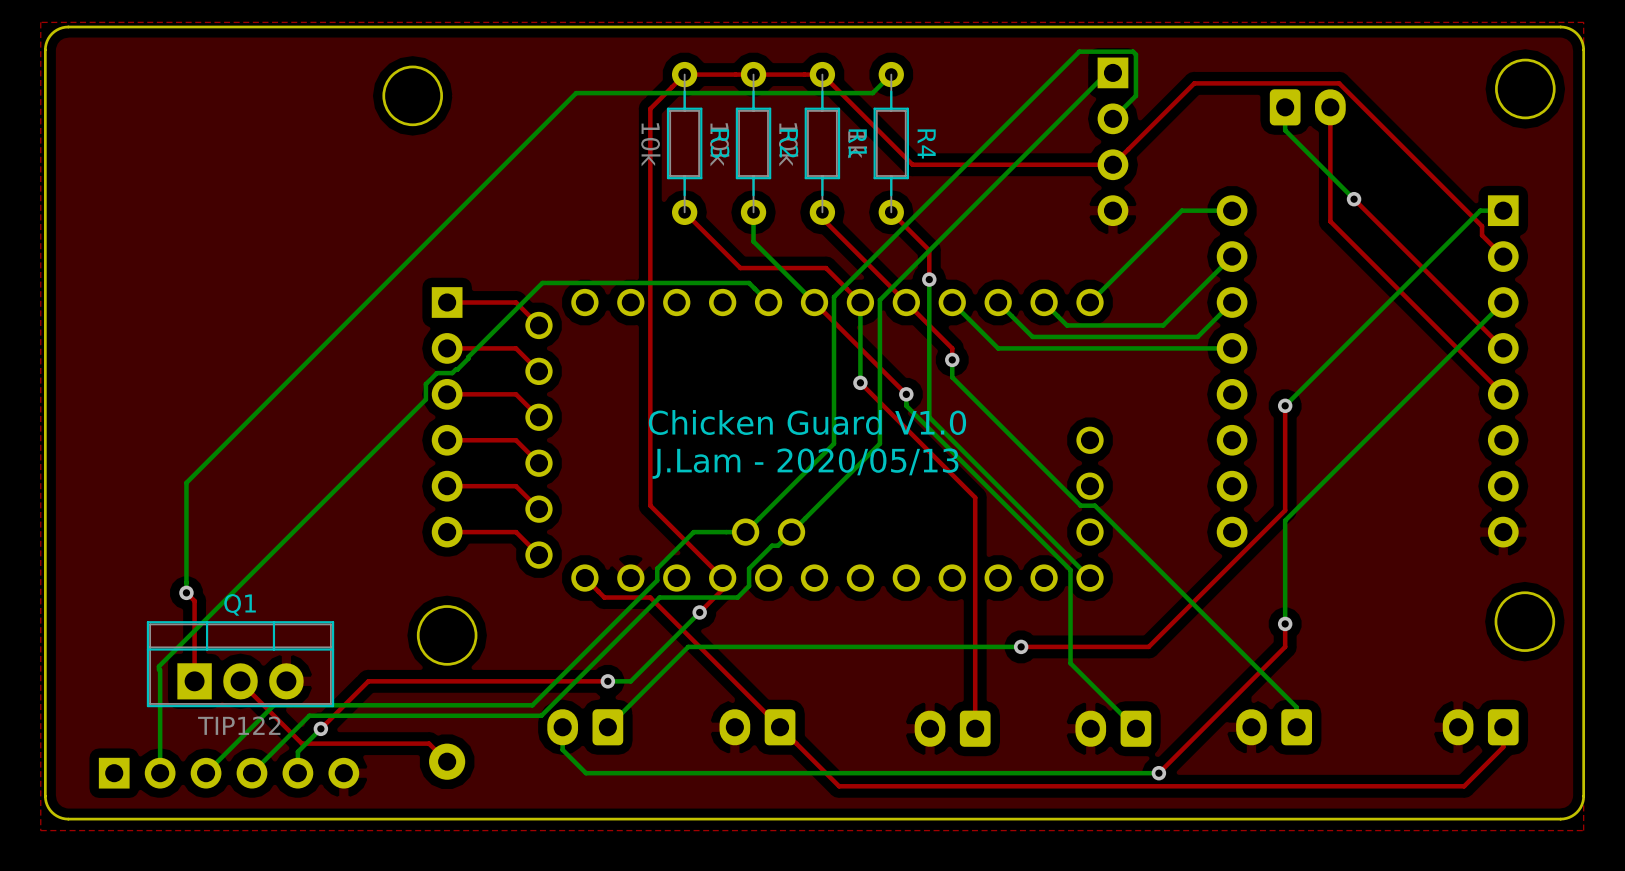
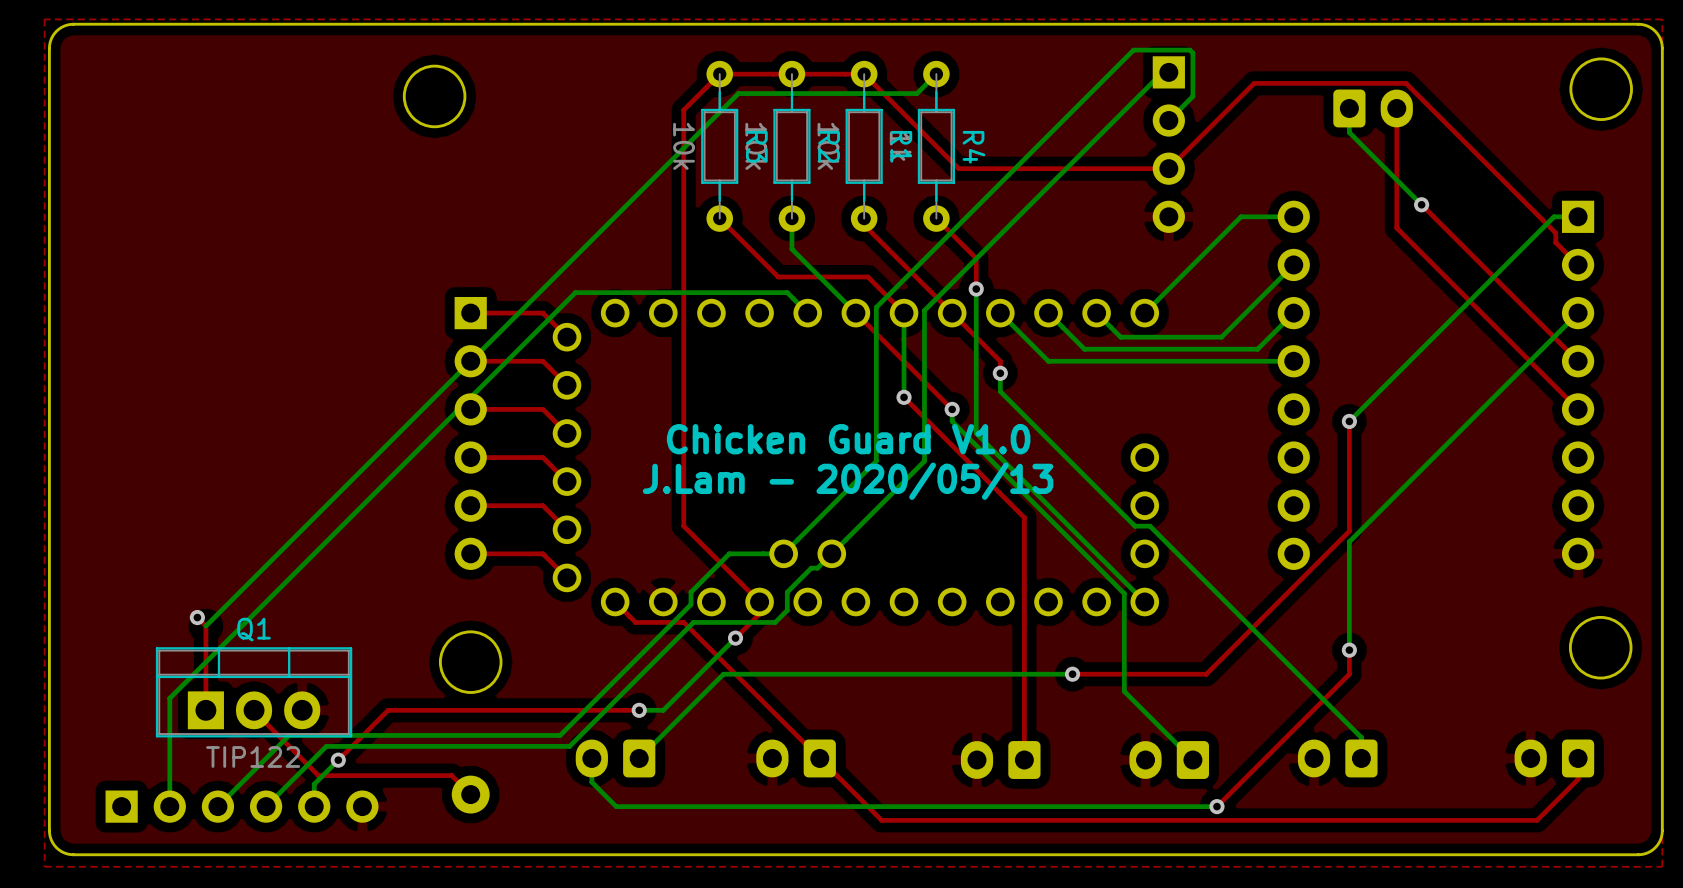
bottom track: (702, 93) (576, 93) (186, 482) (186, 592) -> (738, 93) (205, 626)
bottom track: (545, 283) (542, 283) (457, 369) (452, 373) (436, 373) (425, 384) (425, 399) (158, 666) (158, 669) -> none
bottom track: none -> (575, 292) (169, 698)

